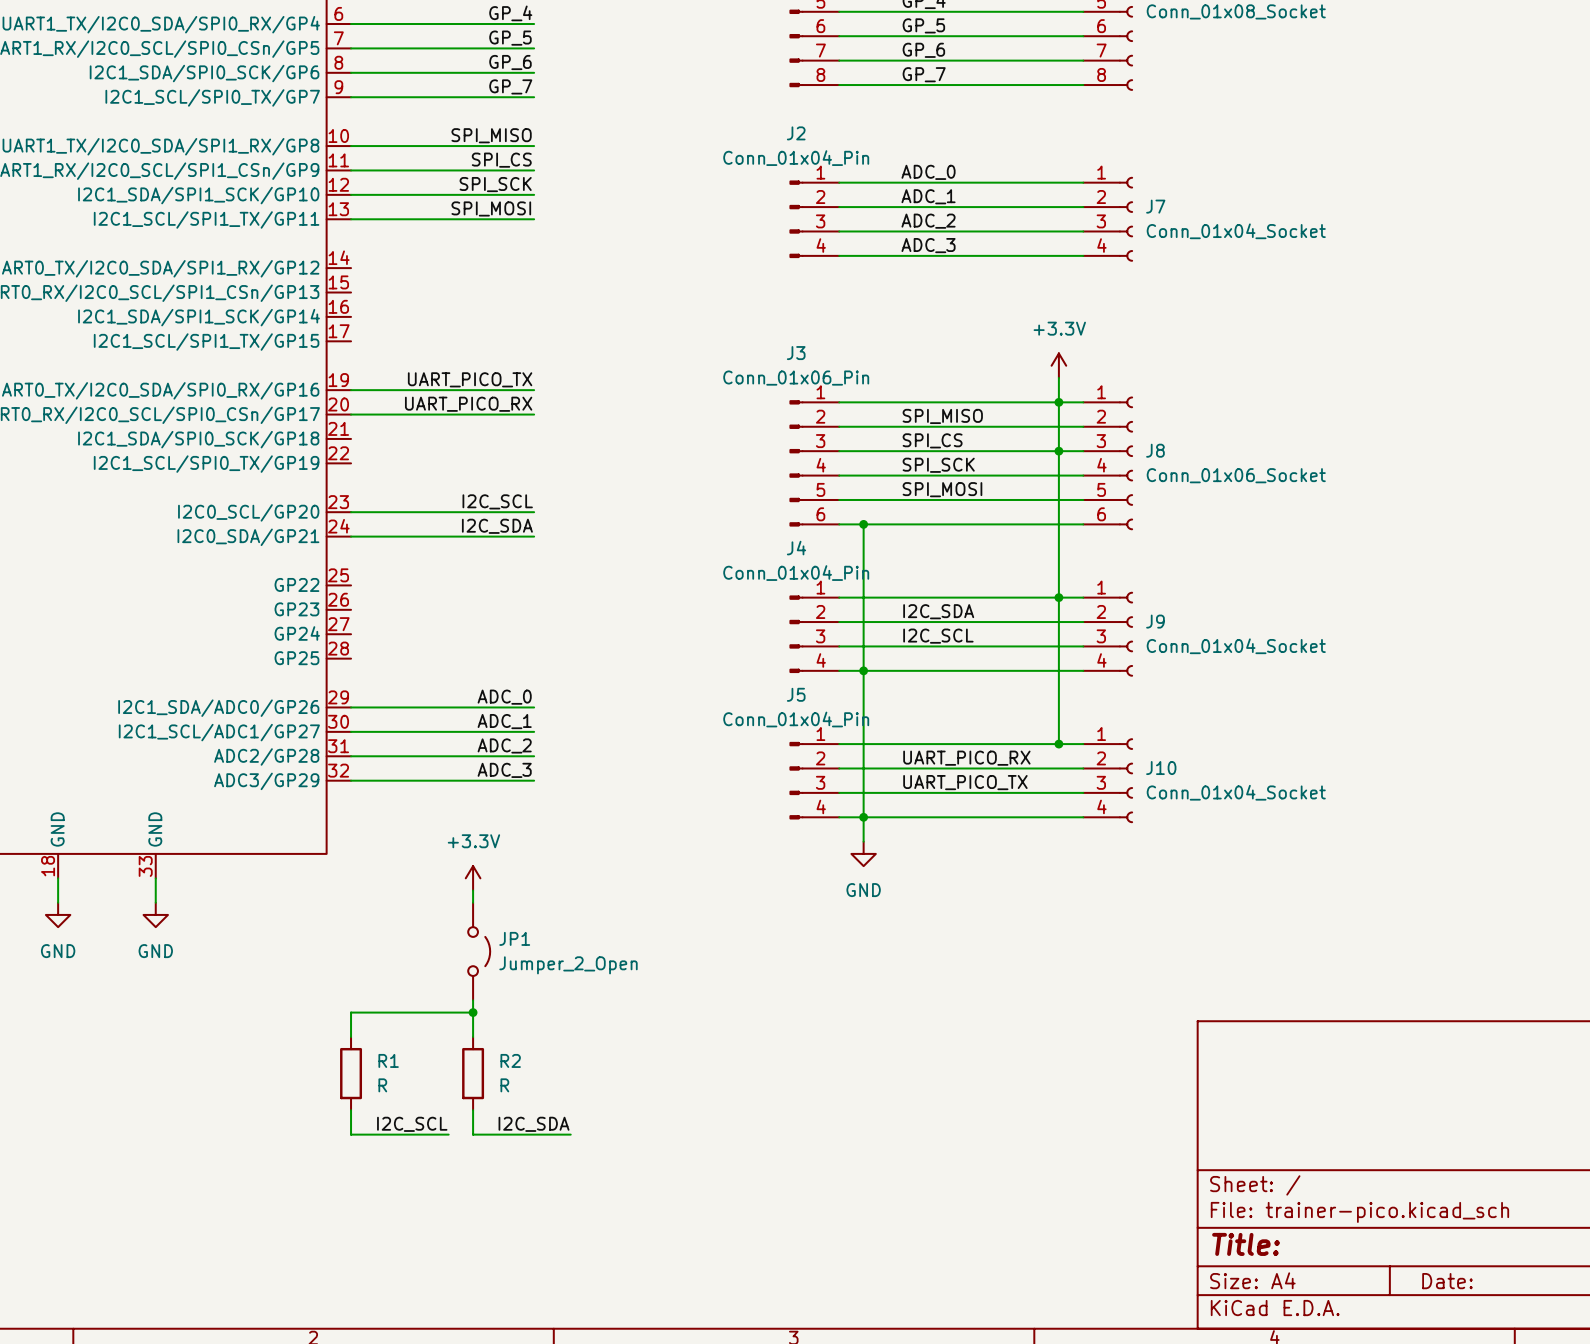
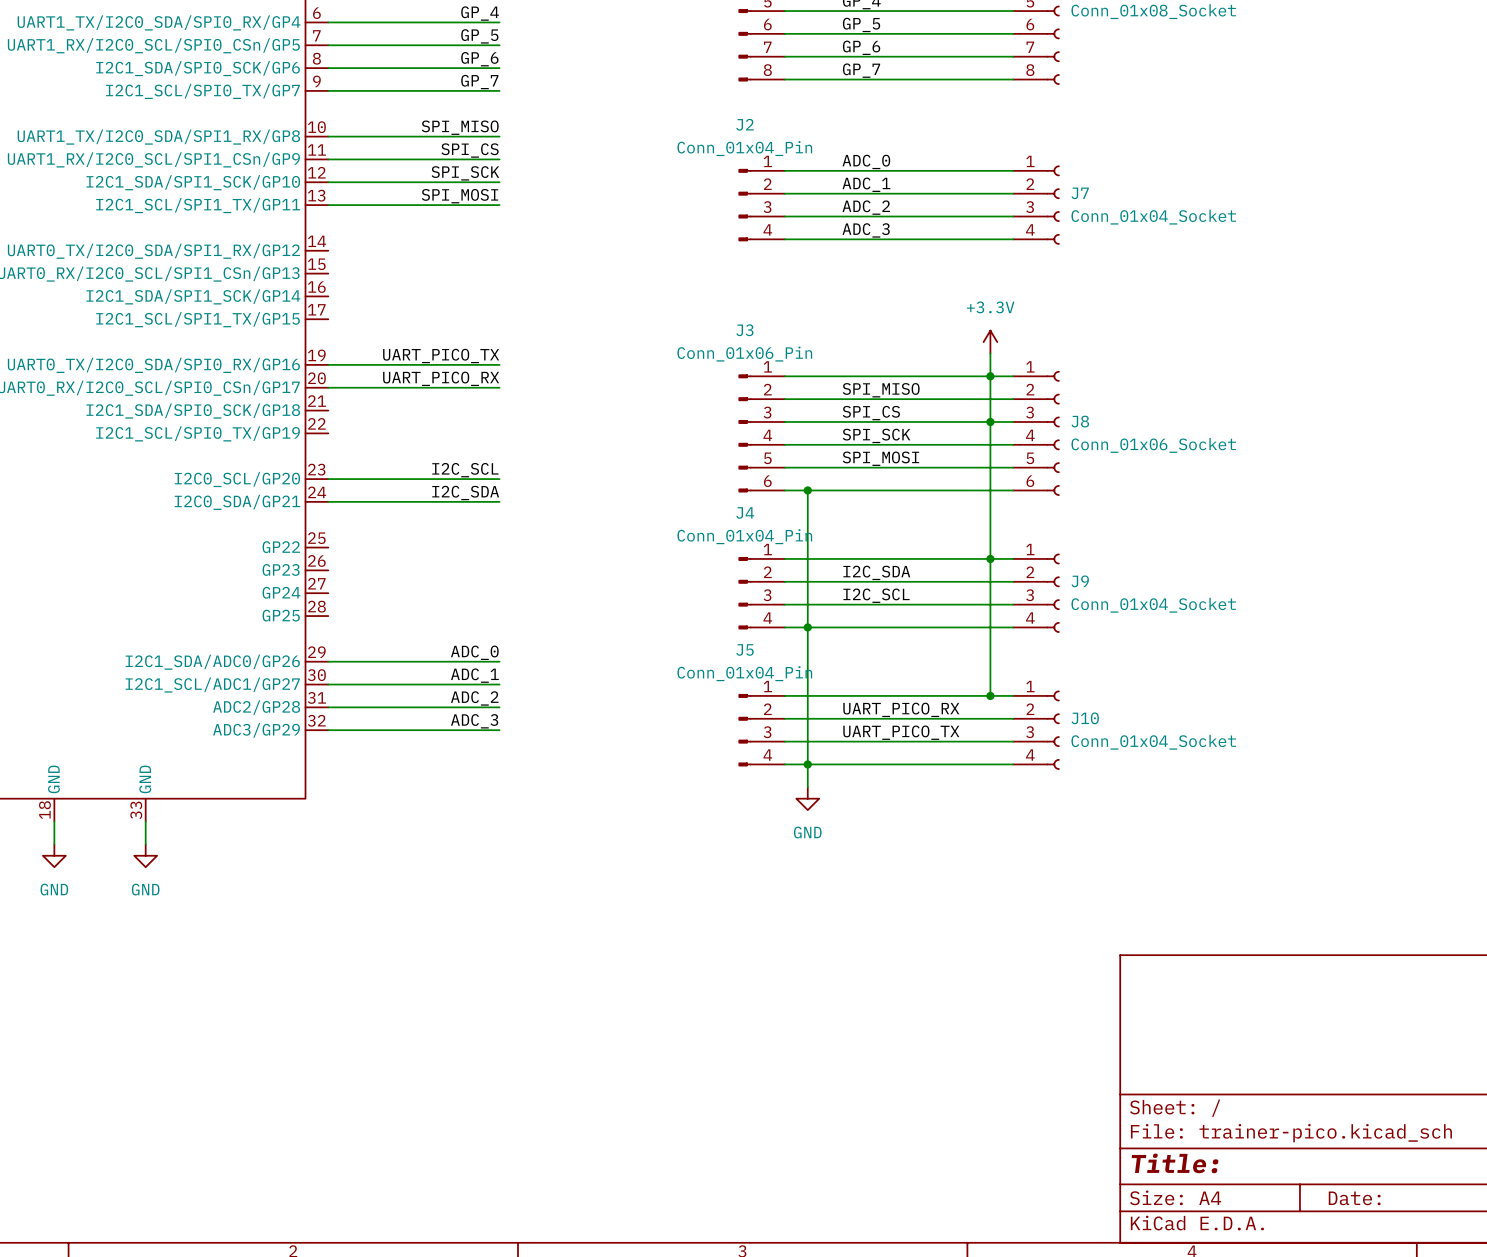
power symbol: +3.3V (473, 878) -> none
wire: (473, 890) (473, 902) -> none
JP1: Jumper_2_Open (479, 951) -> none
wire: (473, 1000) (473, 1036) -> none
wire: (473, 1012) (351, 1012) (351, 1036) -> none
junction: (473, 1012) -> none
R1: R (351, 1073) -> none
R2: R (473, 1073) -> none
wire: (351, 1110) (351, 1134) (448, 1134) -> none
wire: (473, 1110) (473, 1134) (570, 1134) -> none
label: I2C_SCL (412, 1124) -> none
label: I2C_SDA (534, 1124) -> none

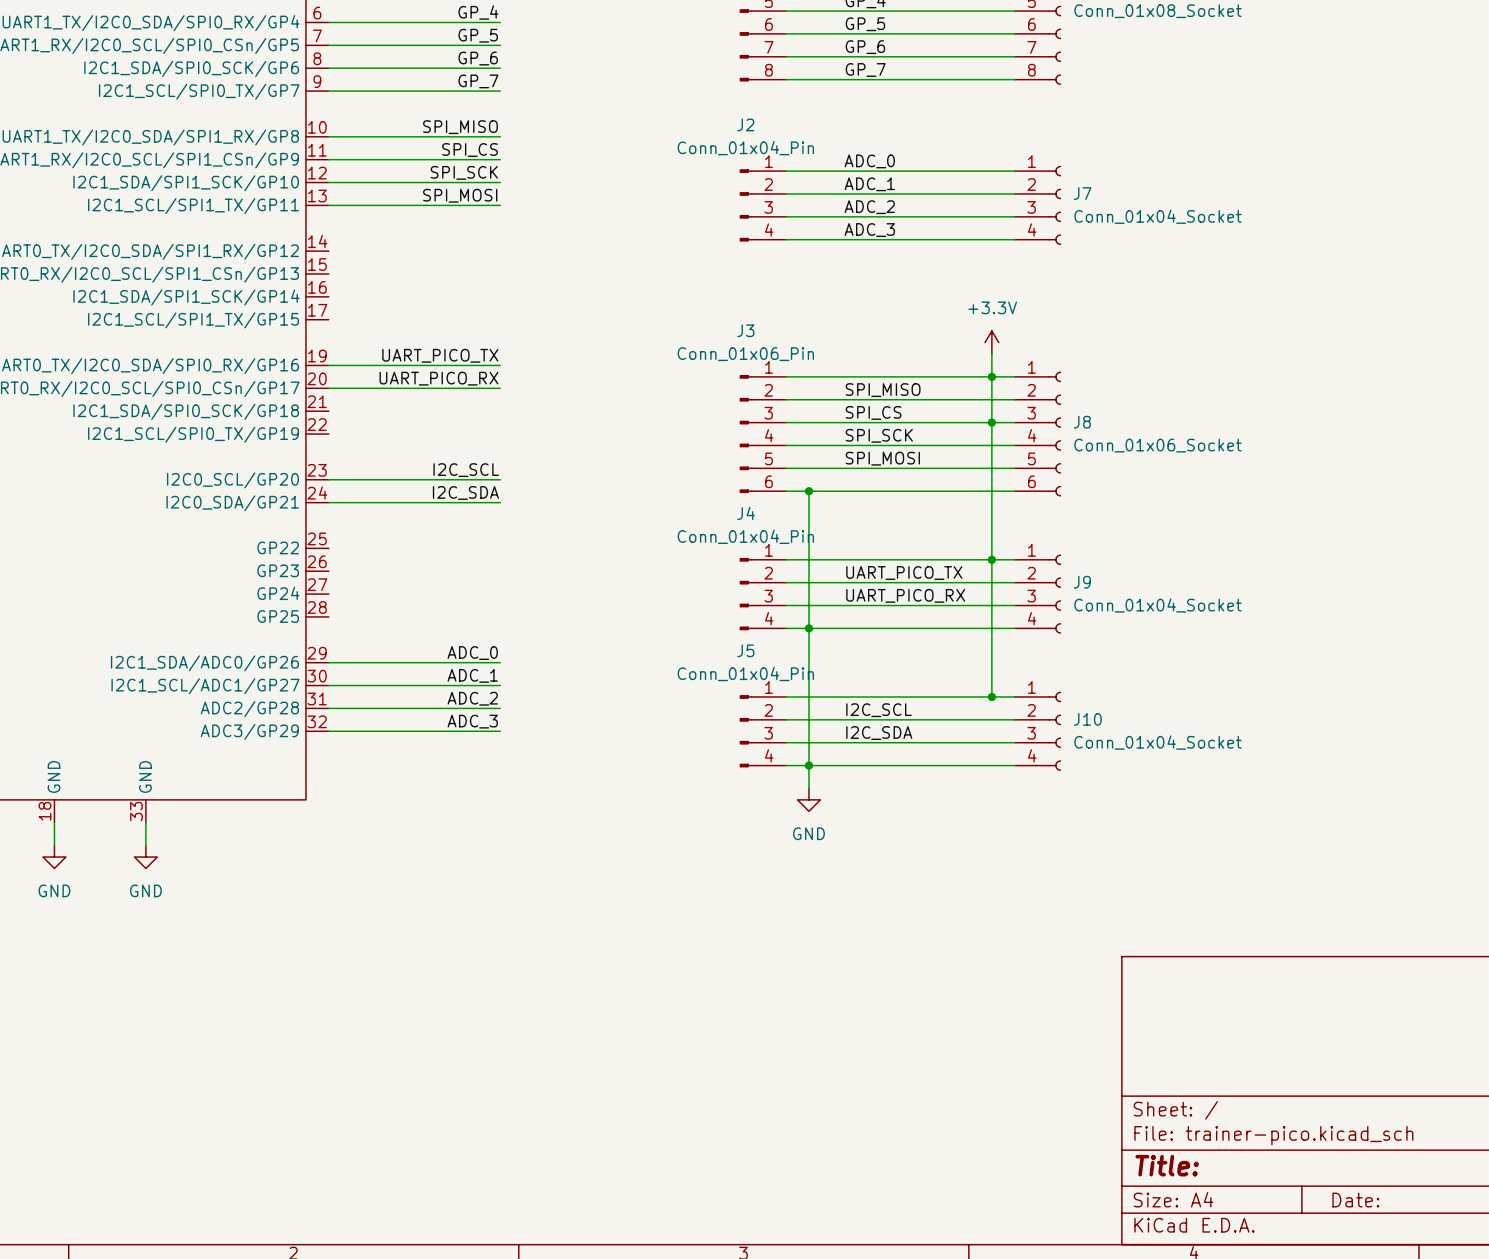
label: I2C_SDA (876, 572) -> UART_PICO_TX (904, 573)
label: I2C_SCL (876, 595) -> UART_PICO_RX (905, 595)
label: UART_PICO_RX (901, 709) -> I2C_SCL (879, 710)
label: UART_PICO_TX (901, 732) -> I2C_SDA (879, 733)

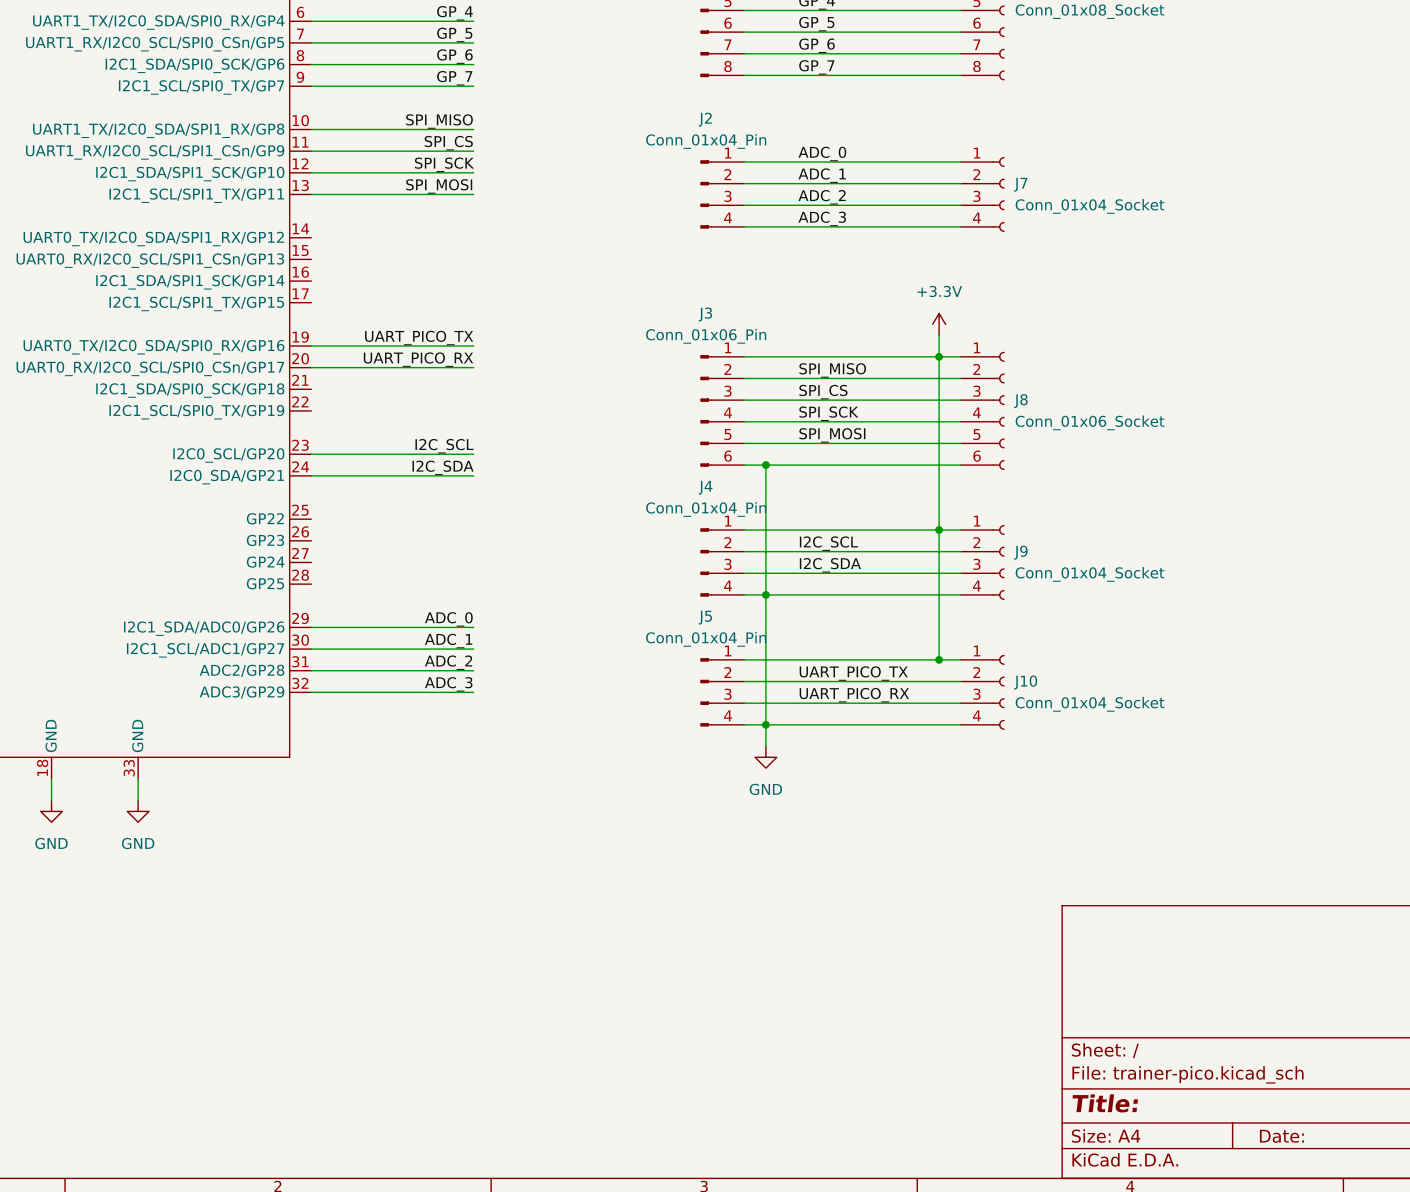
junction: (991, 422) -> none
label: UART_PICO_TX (904, 573) -> I2C_SCL (828, 543)
label: UART_PICO_RX (905, 595) -> I2C_SDA (830, 565)
label: I2C_SCL (879, 710) -> UART_PICO_TX (853, 673)
label: I2C_SDA (879, 733) -> UART_PICO_RX (854, 695)

